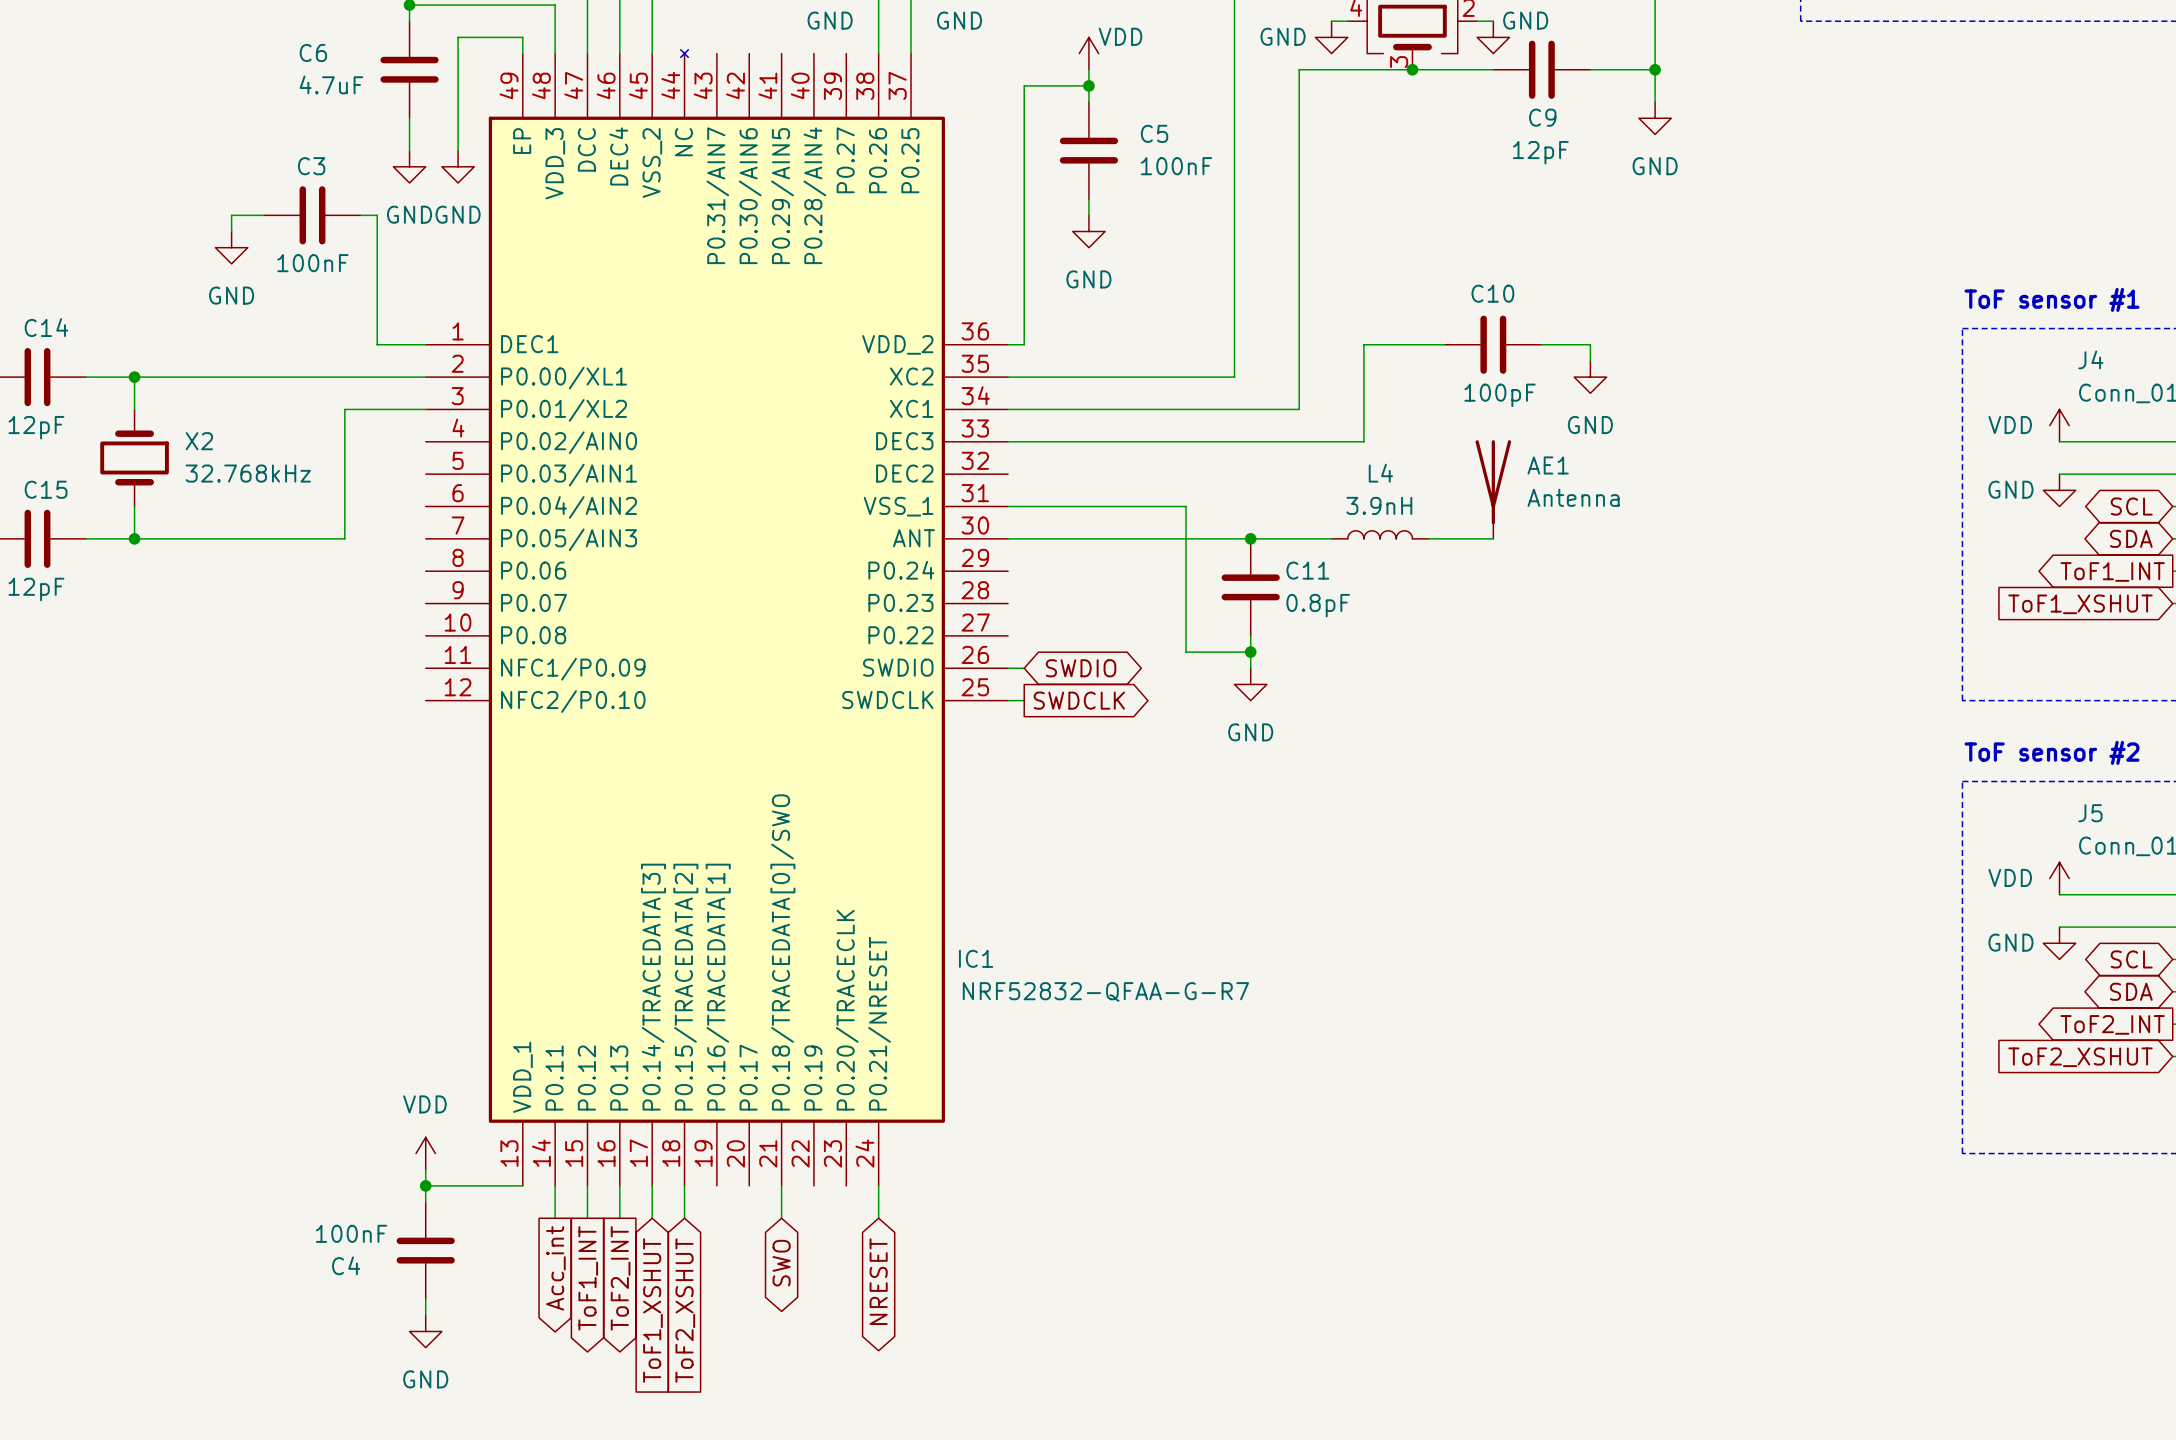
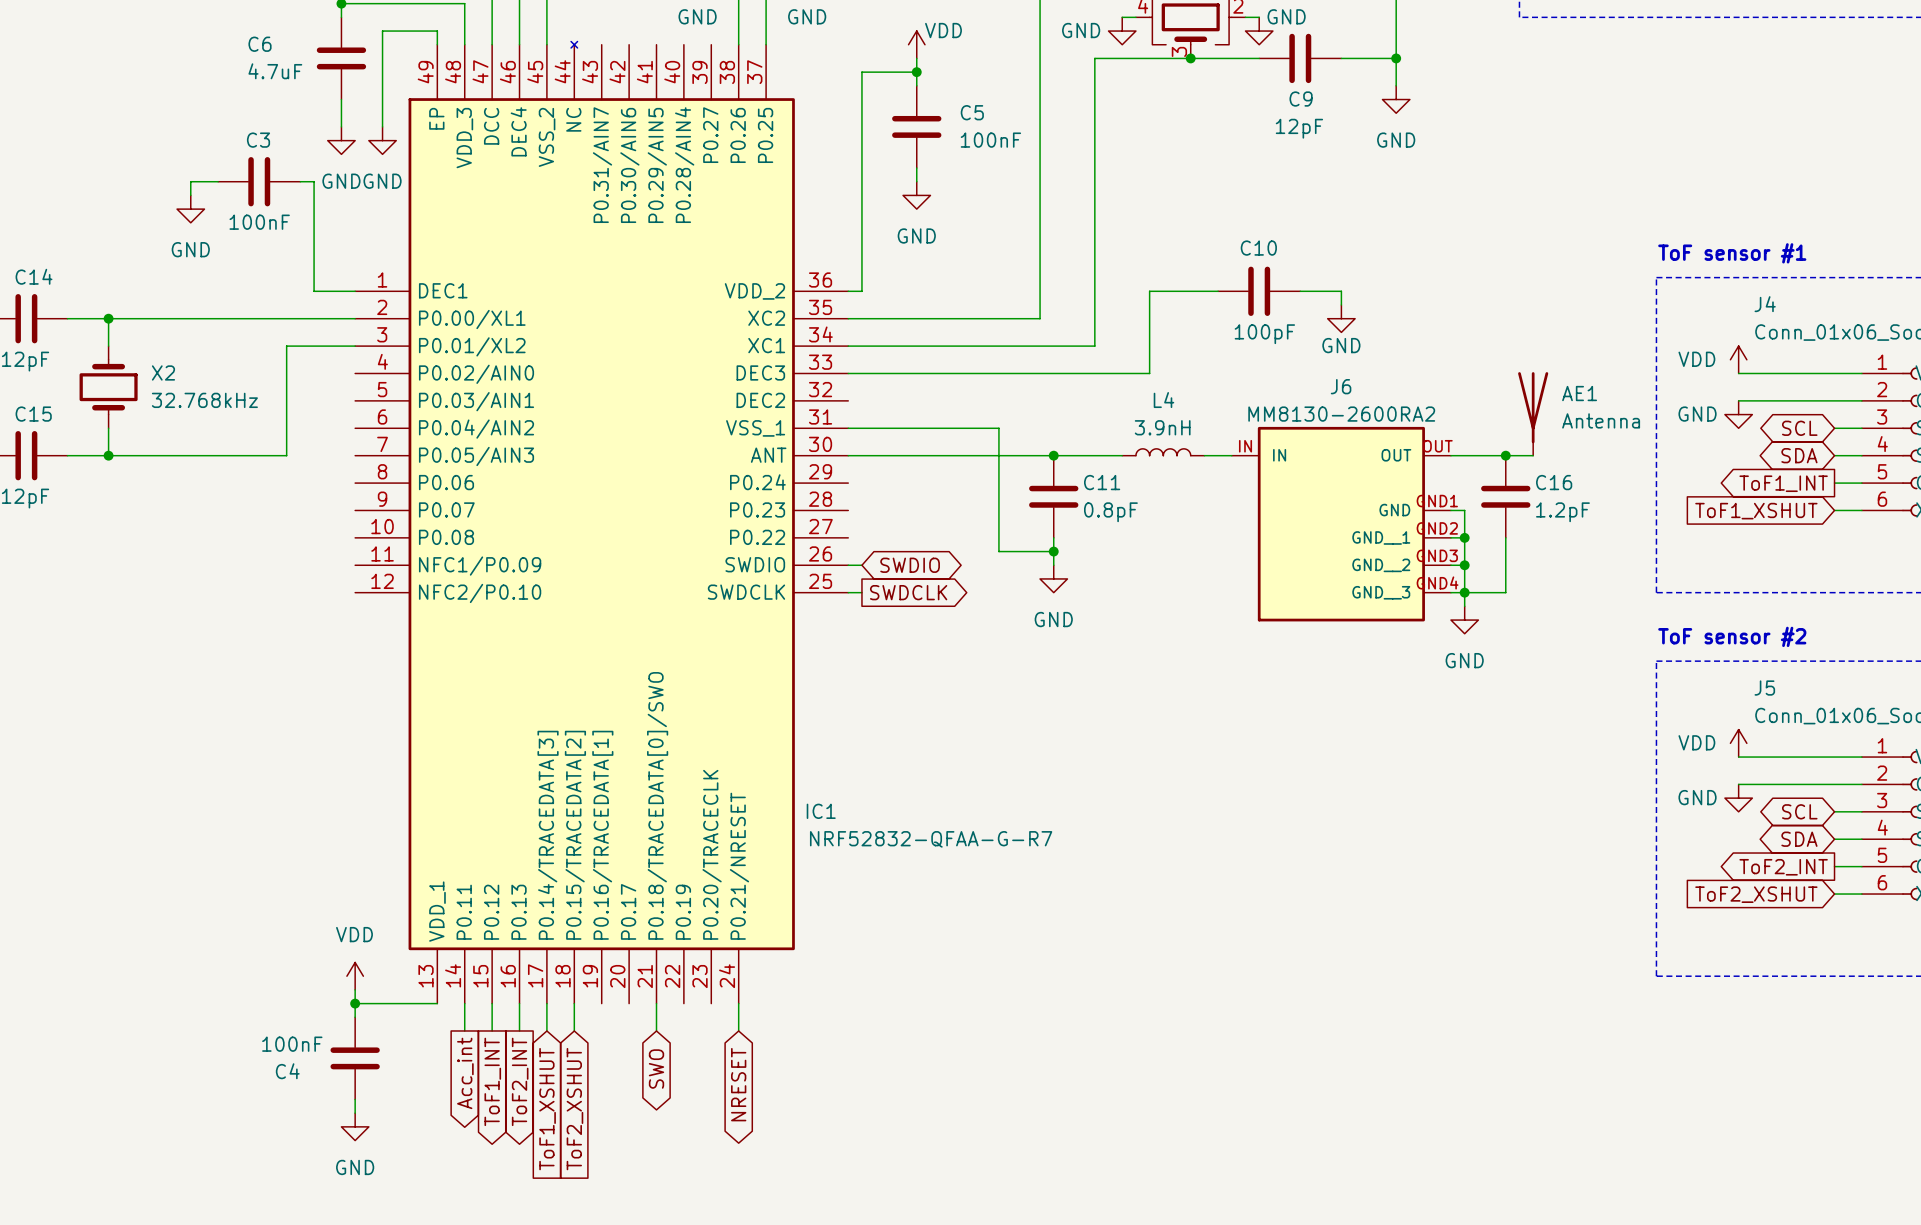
power symbol text position: GND (1590, 425) -> GND (1341, 345)
AE1 position: (1493, 489) -> (1533, 413)
wire: none -> (1450, 455) (1533, 455)
junction: none -> (1505, 455)
C16: none -> 1.2pF (1505, 496)
wire: none -> (1450, 510) (1464, 510) (1464, 606)
J6: none -> MM8130-2600RA2 (1341, 524)
wire: none -> (1450, 537) (1464, 537)
junction: none -> (1464, 537)
wire: none -> (1505, 537) (1505, 592) (1450, 592)
wire: none -> (1450, 565) (1464, 565)
junction: none -> (1464, 565)
junction: none -> (1464, 592)
power symbol: none -> GND (1464, 620)

